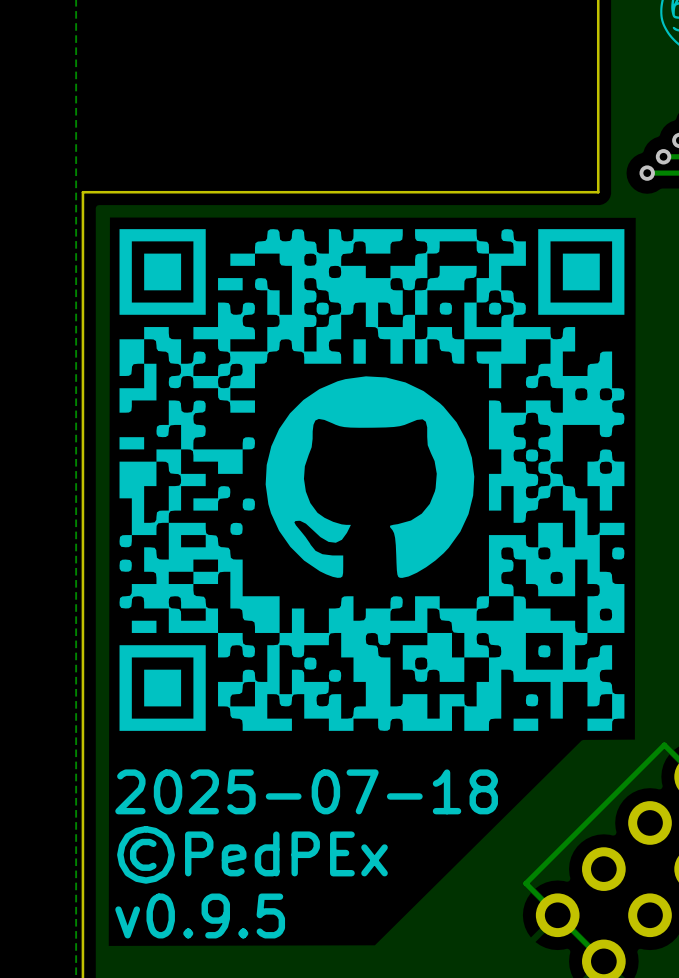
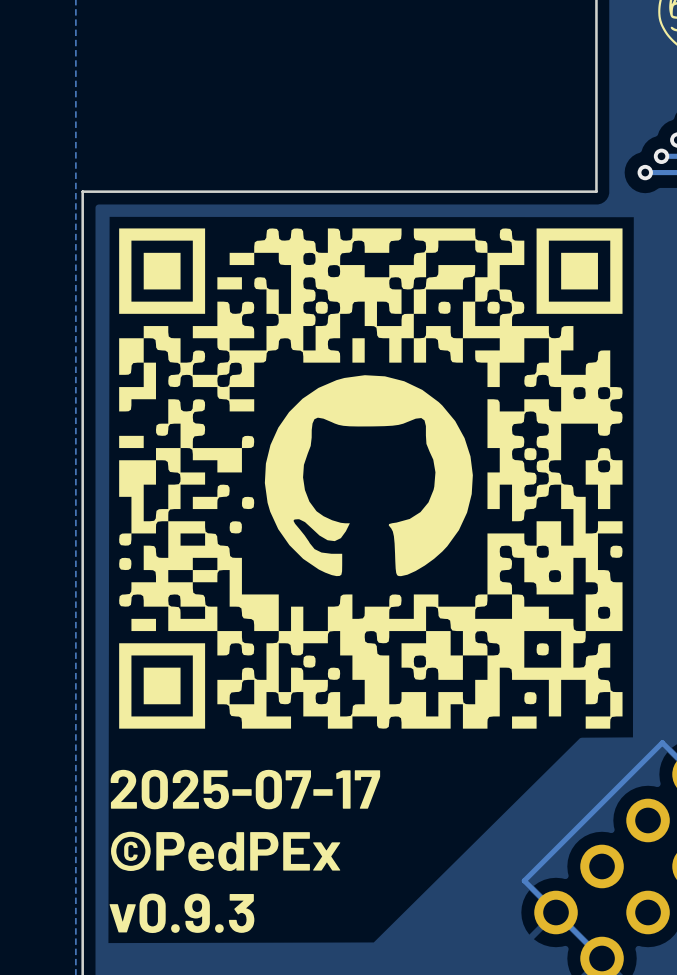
text: 2025-07-18 (306, 791) -> 2025-07-17 (245, 789)
text: v0.9.5 (200, 915) -> v0.9.3 (181, 913)

